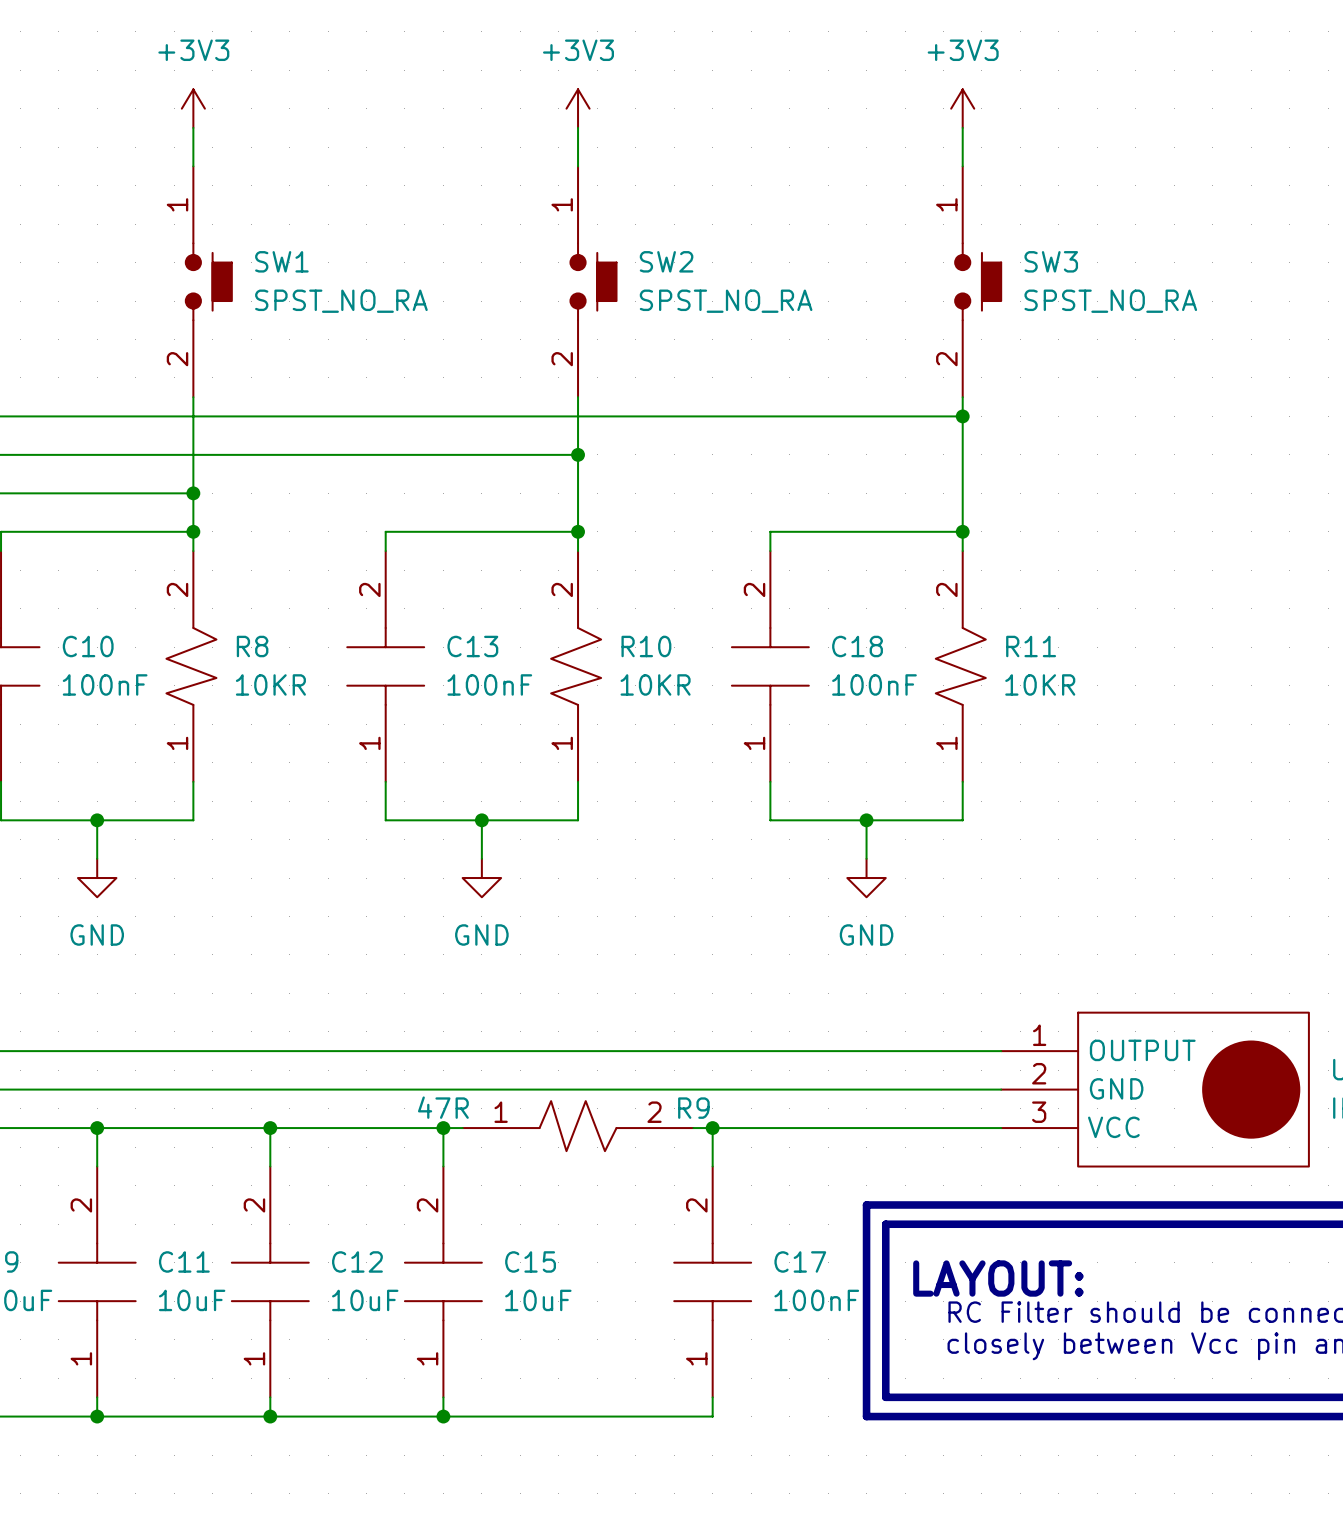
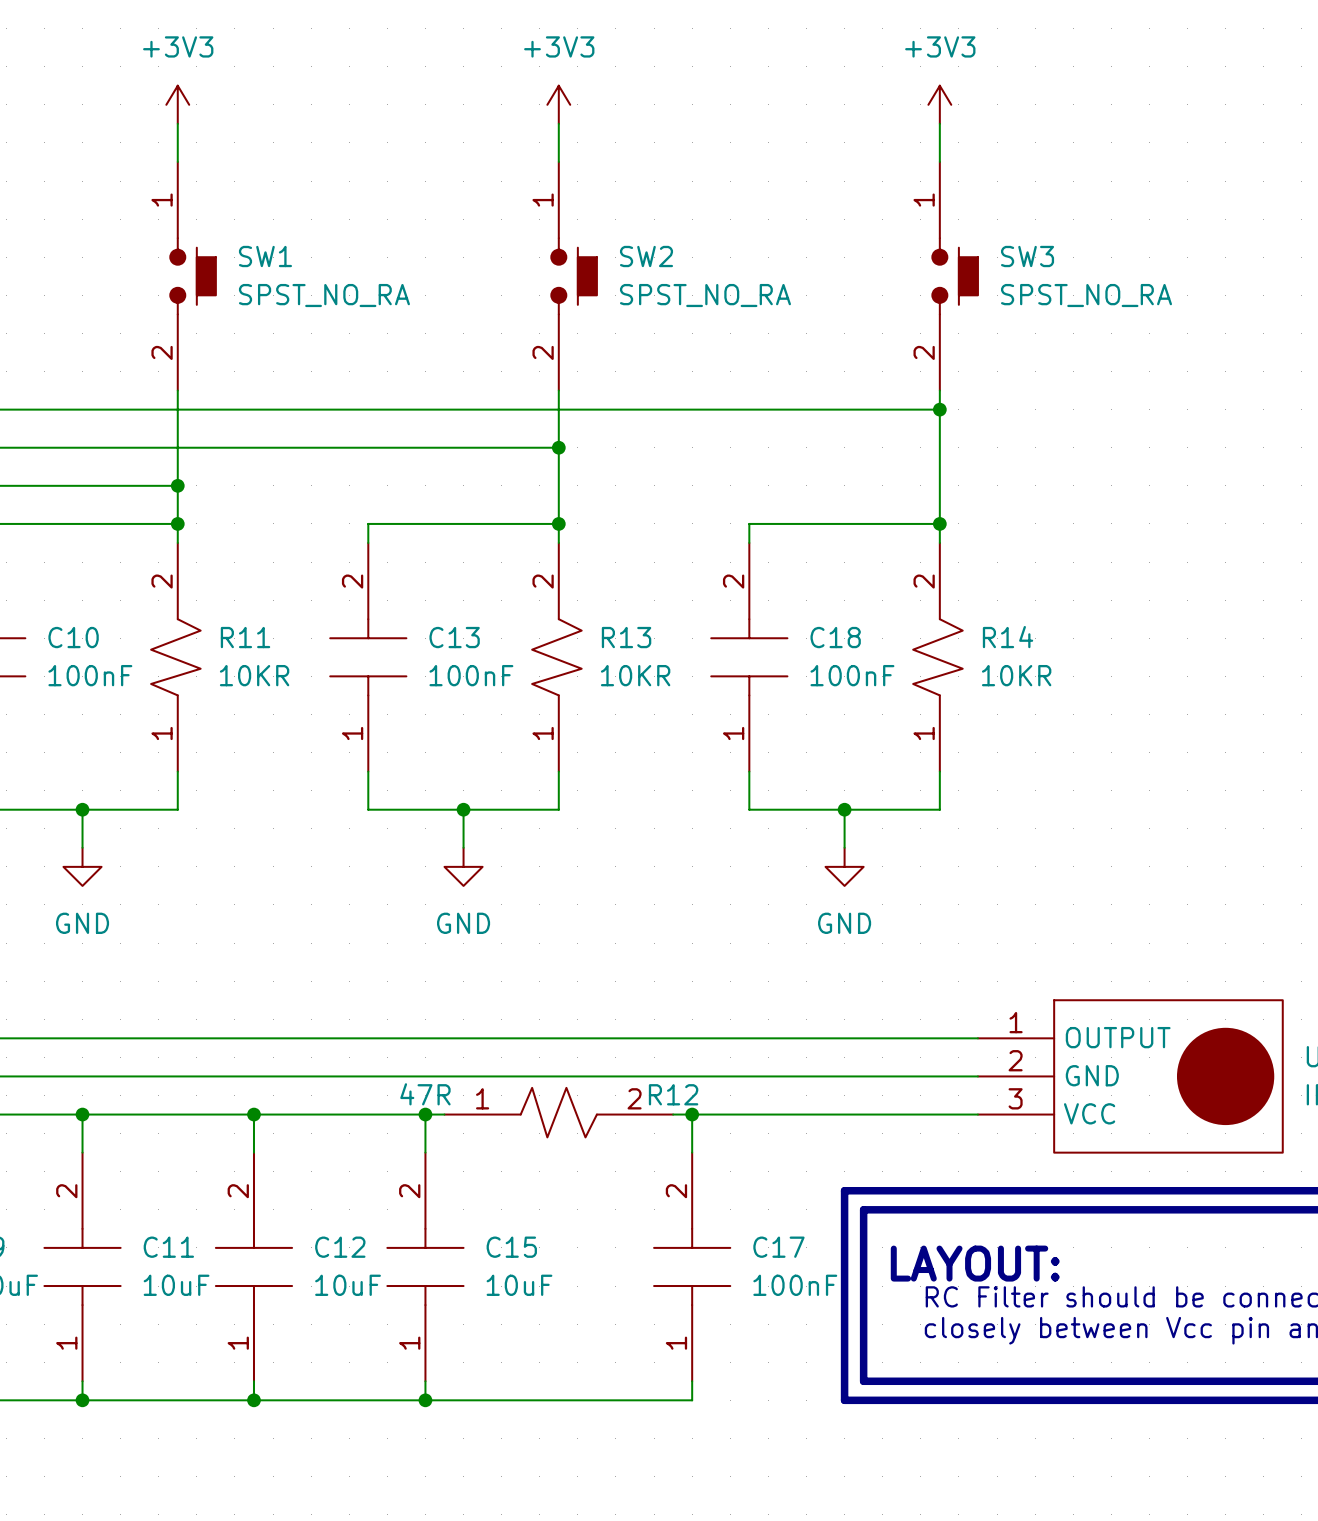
R8 name: R8 (252, 646) -> R11 (245, 637)
R10 name: R10 (646, 646) -> R13 (626, 637)
R11 name: R11 (1031, 646) -> R14 (1008, 637)
R9 name: R9 (693, 1108) -> R12 (673, 1094)

